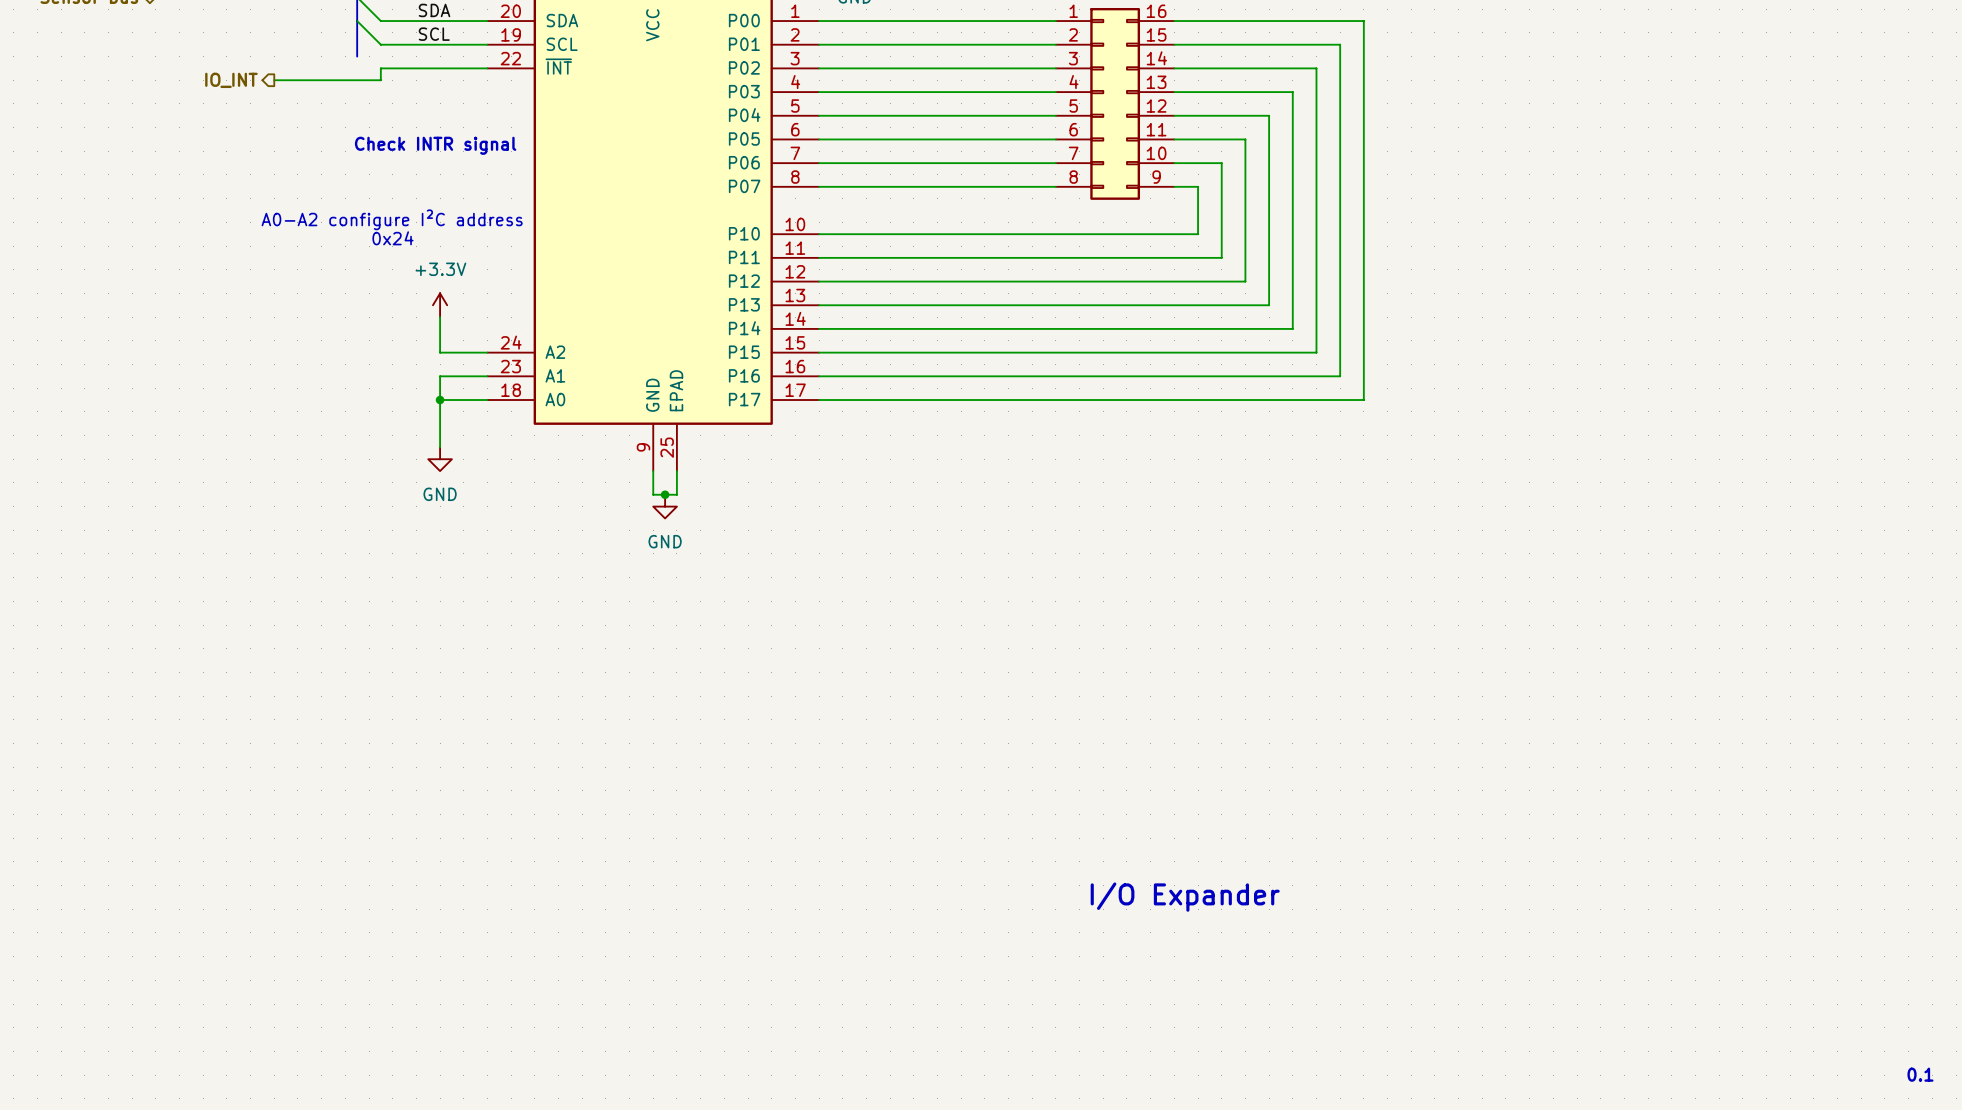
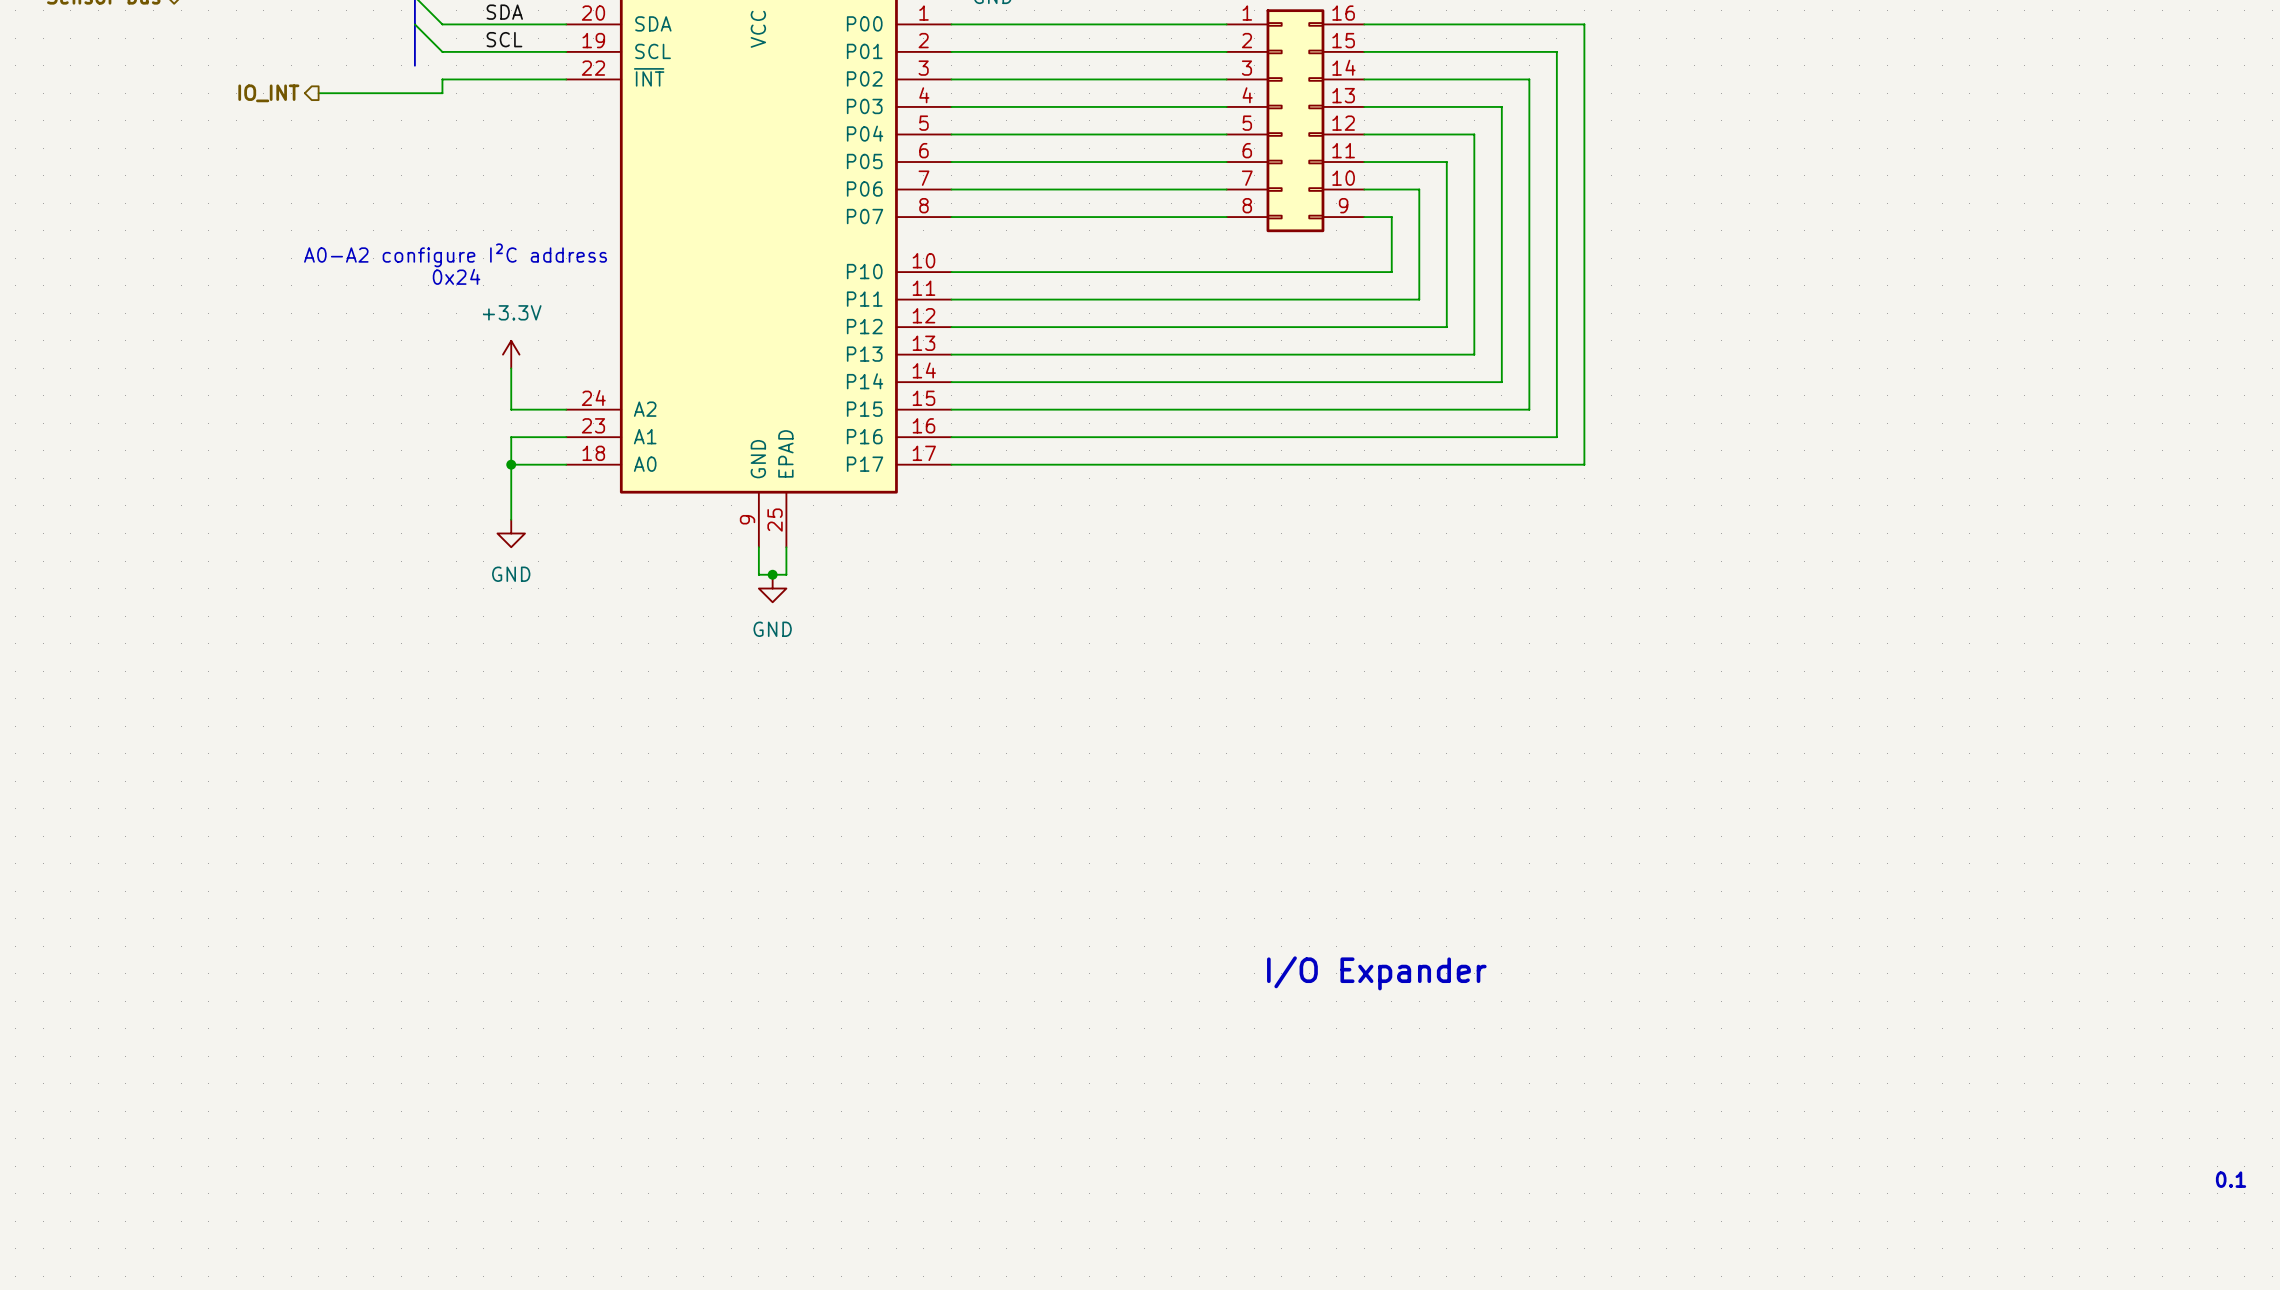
text: Check INTR signal (435, 145) -> none
text position: I/O Expander (1185, 897) -> I/O Expander (1376, 973)
text position: 0.1 (1920, 1074) -> 0.1 (2231, 1179)

